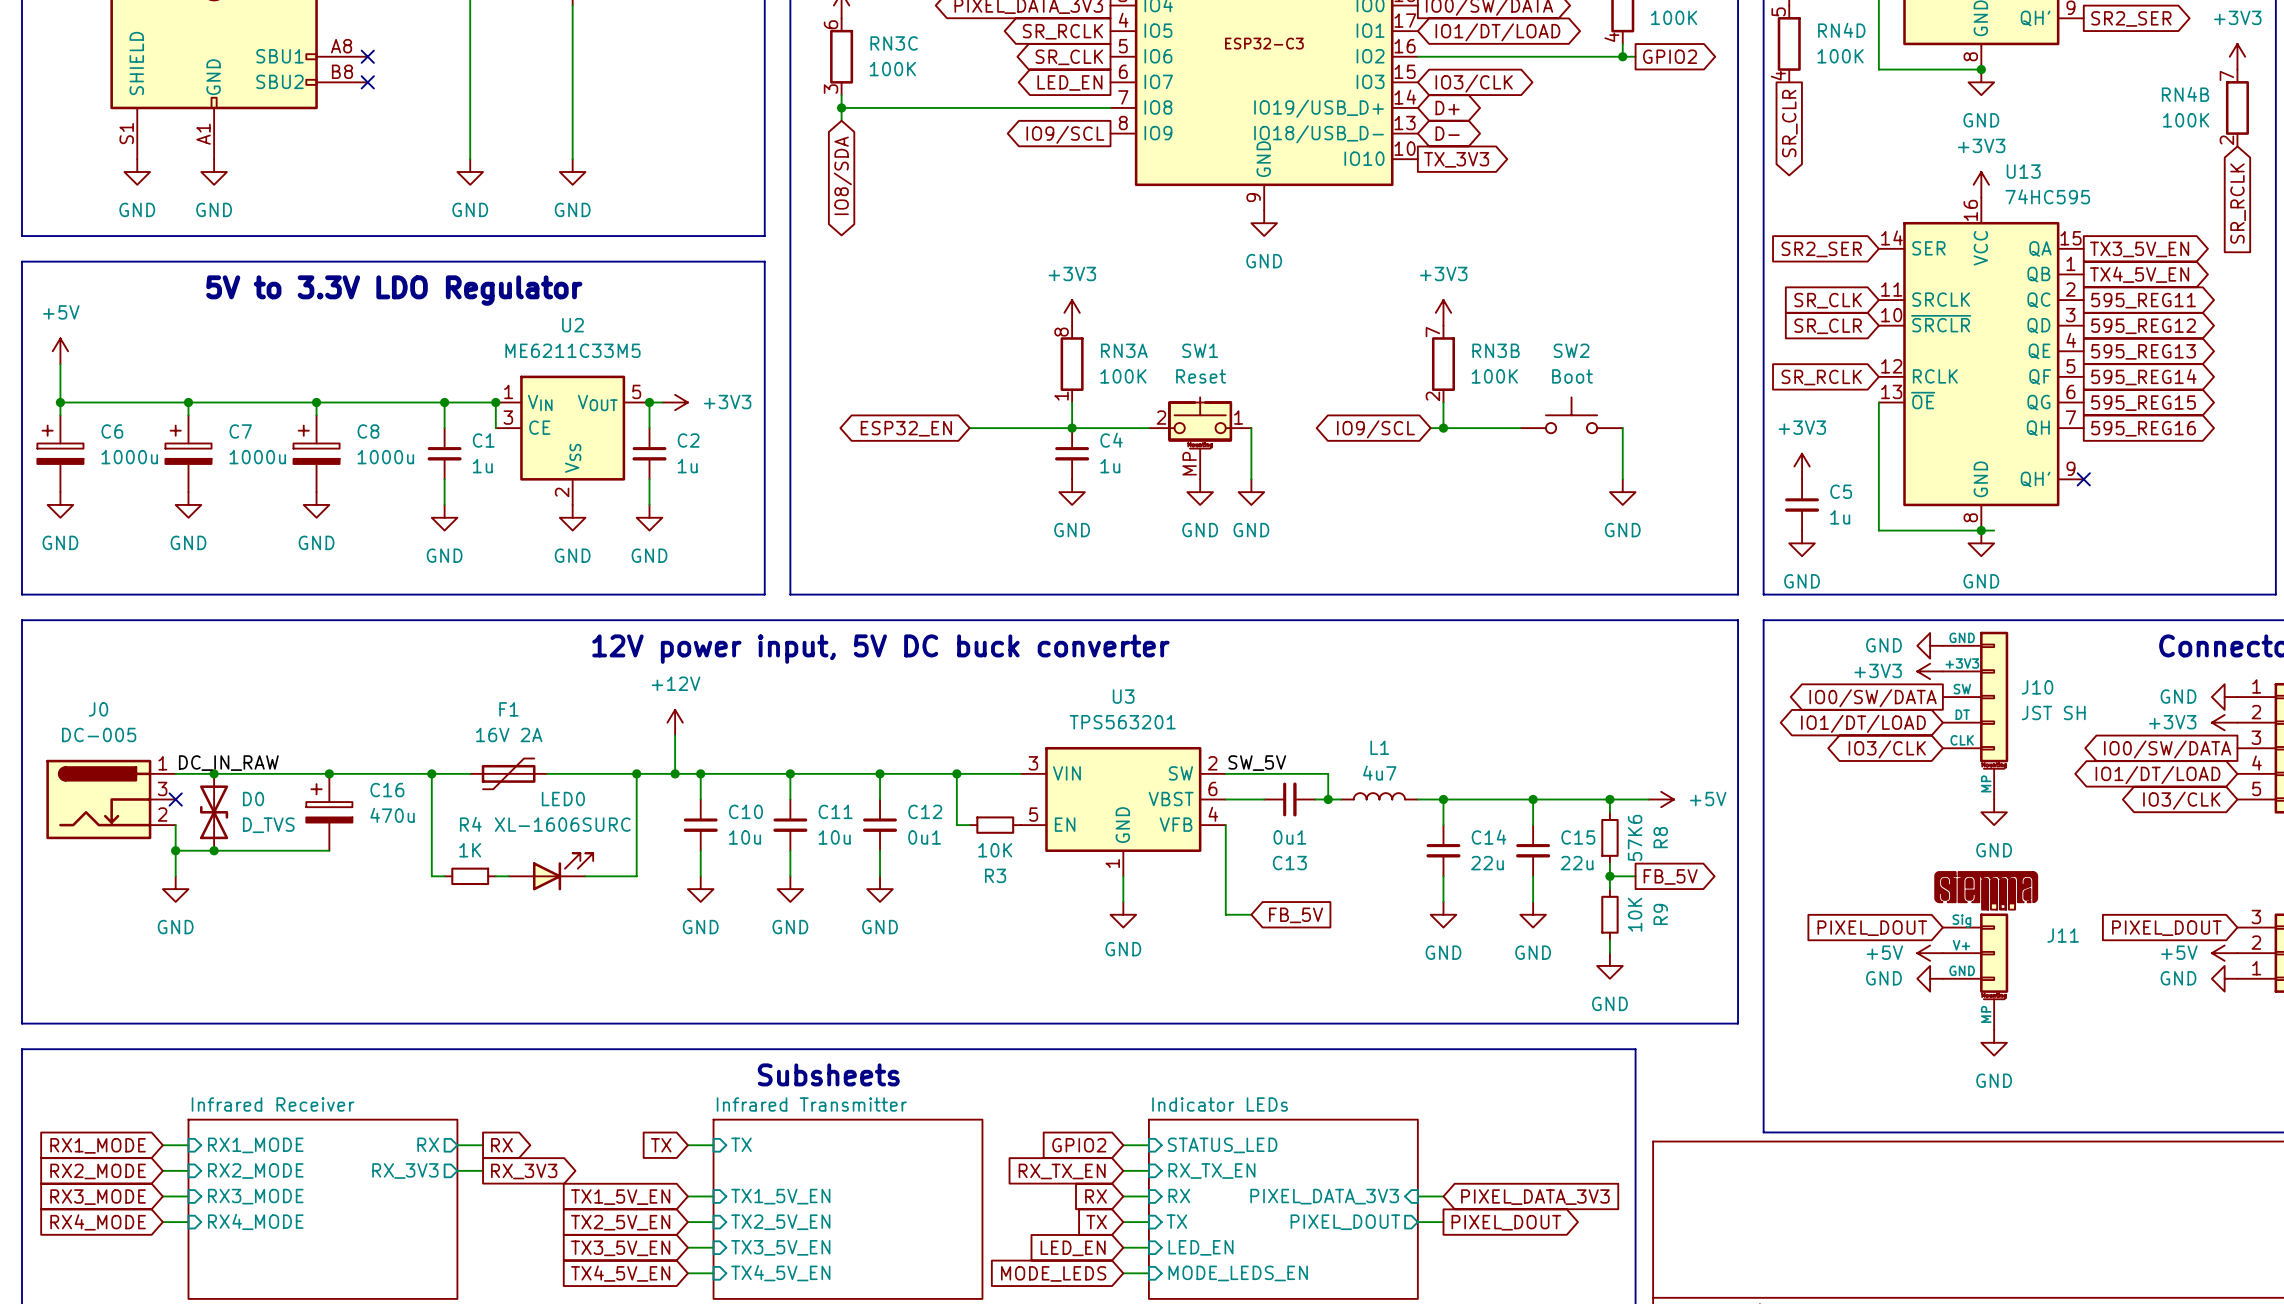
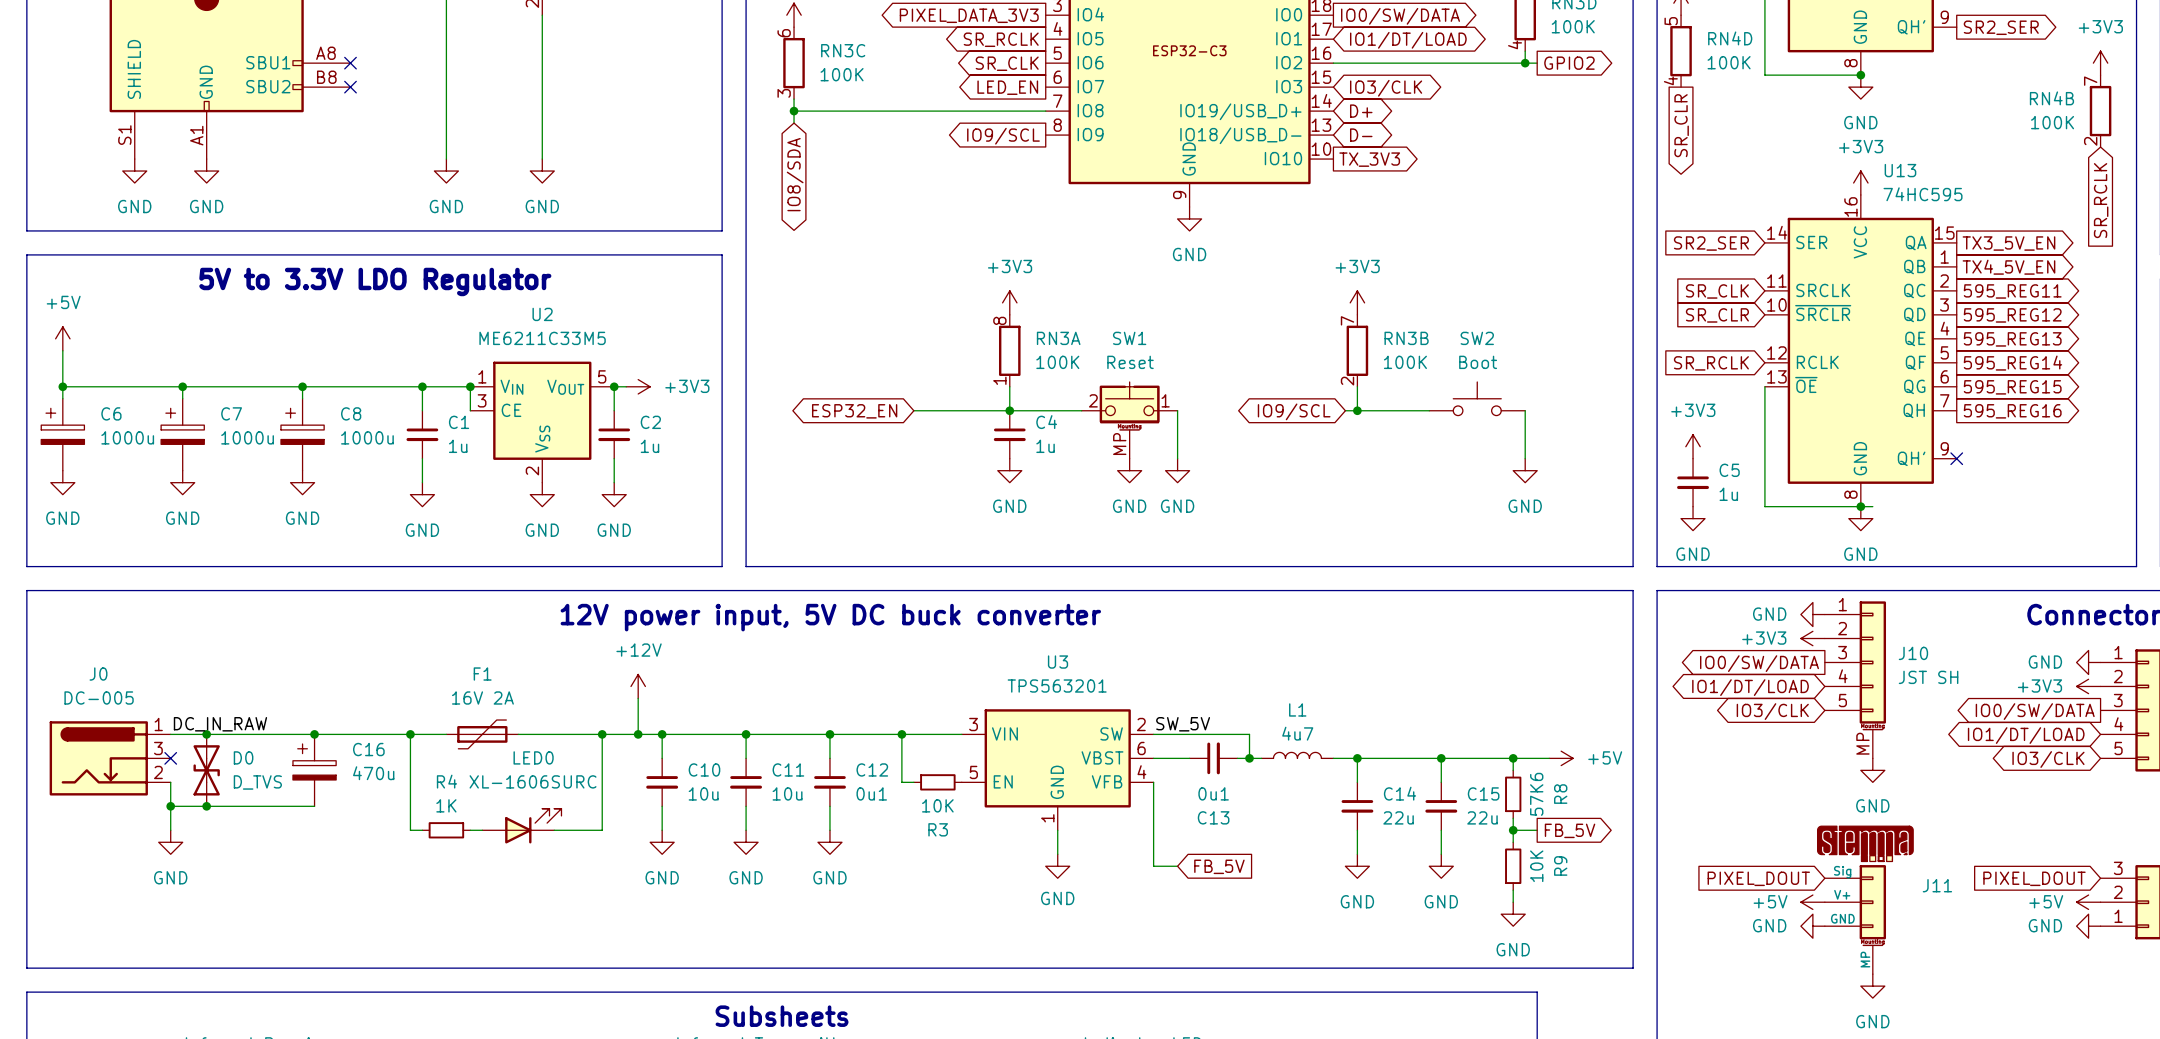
J10 symbol: [1942, 631, 2009, 800] -> [1824, 601, 1887, 759]

